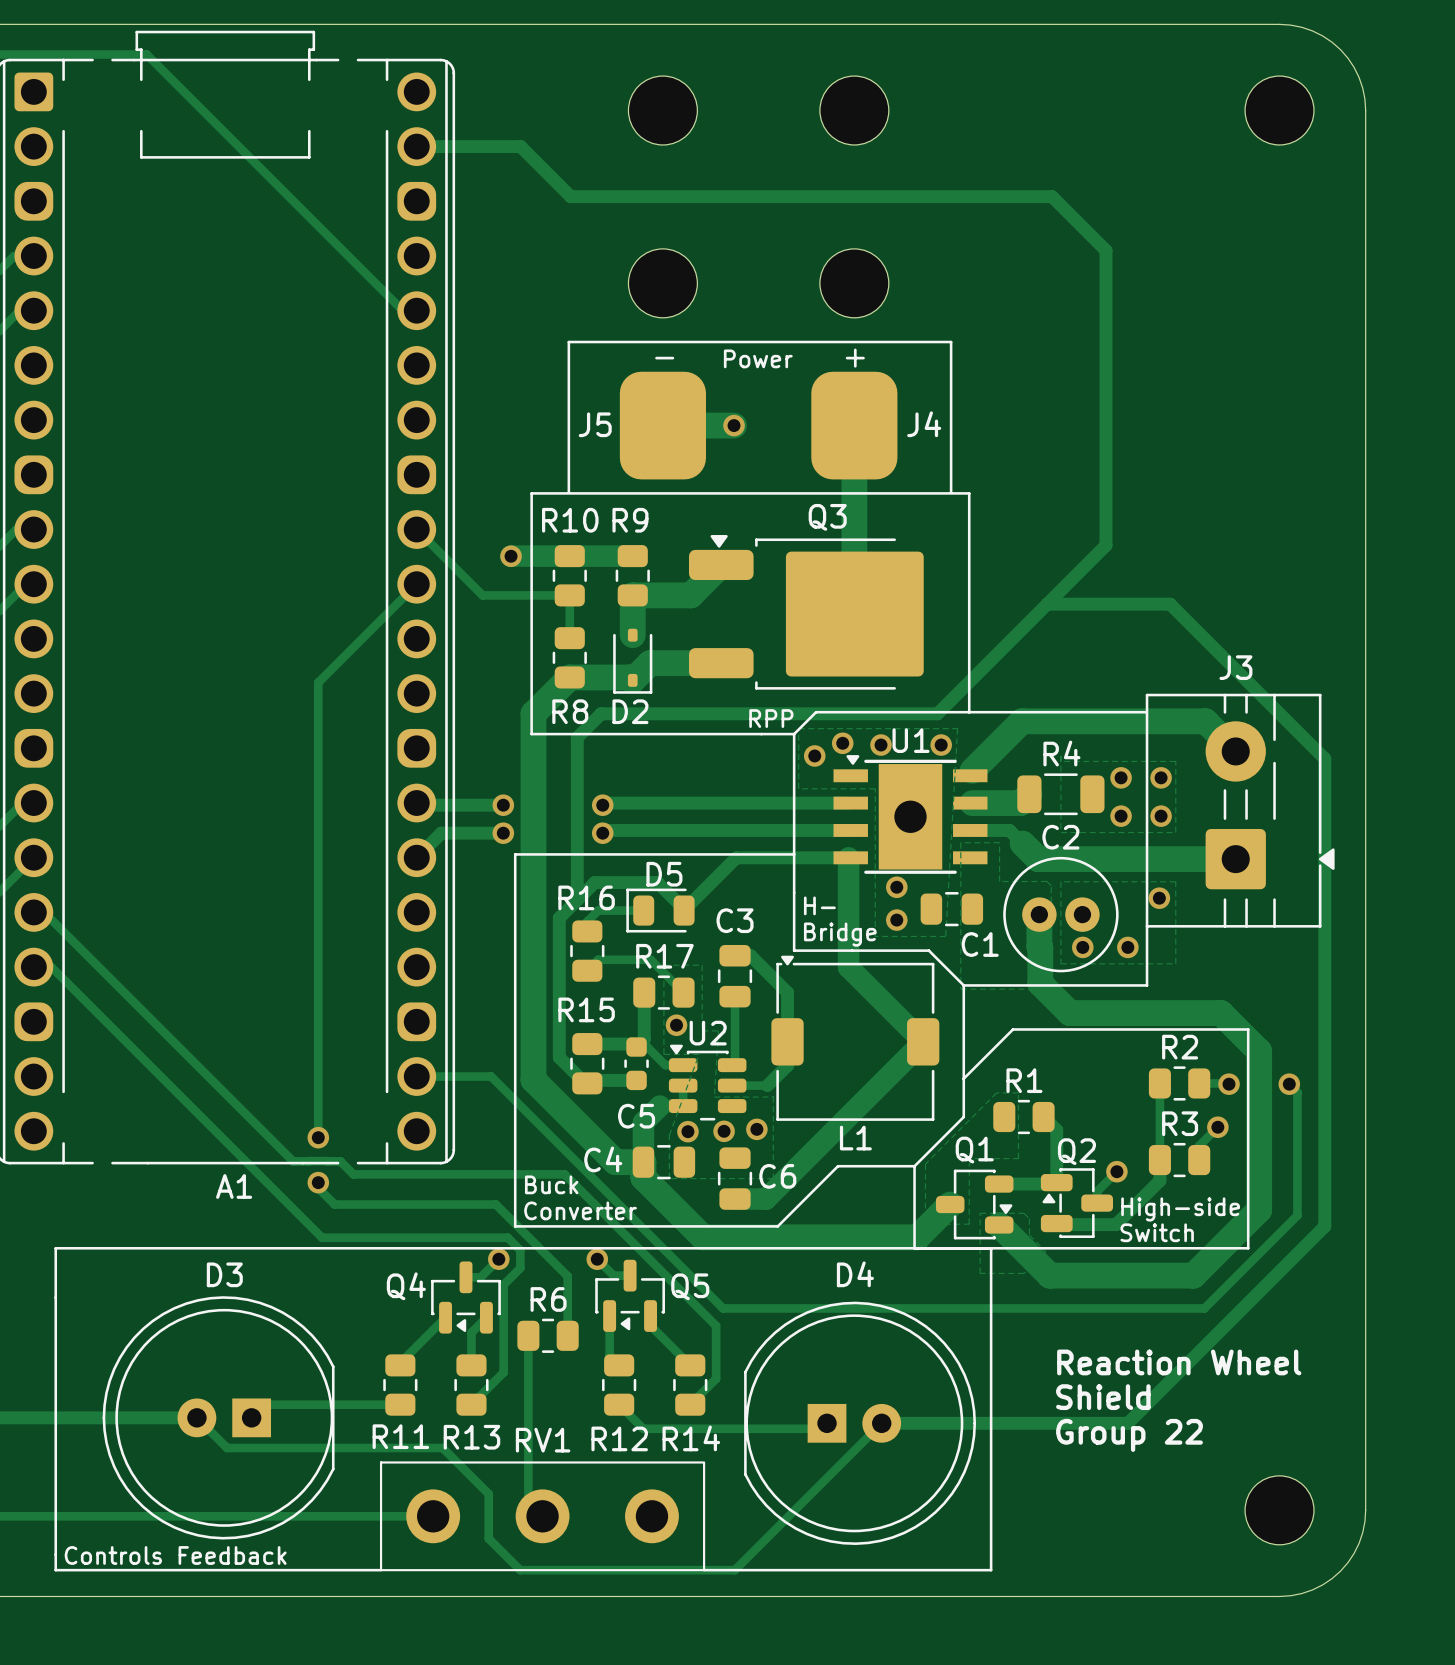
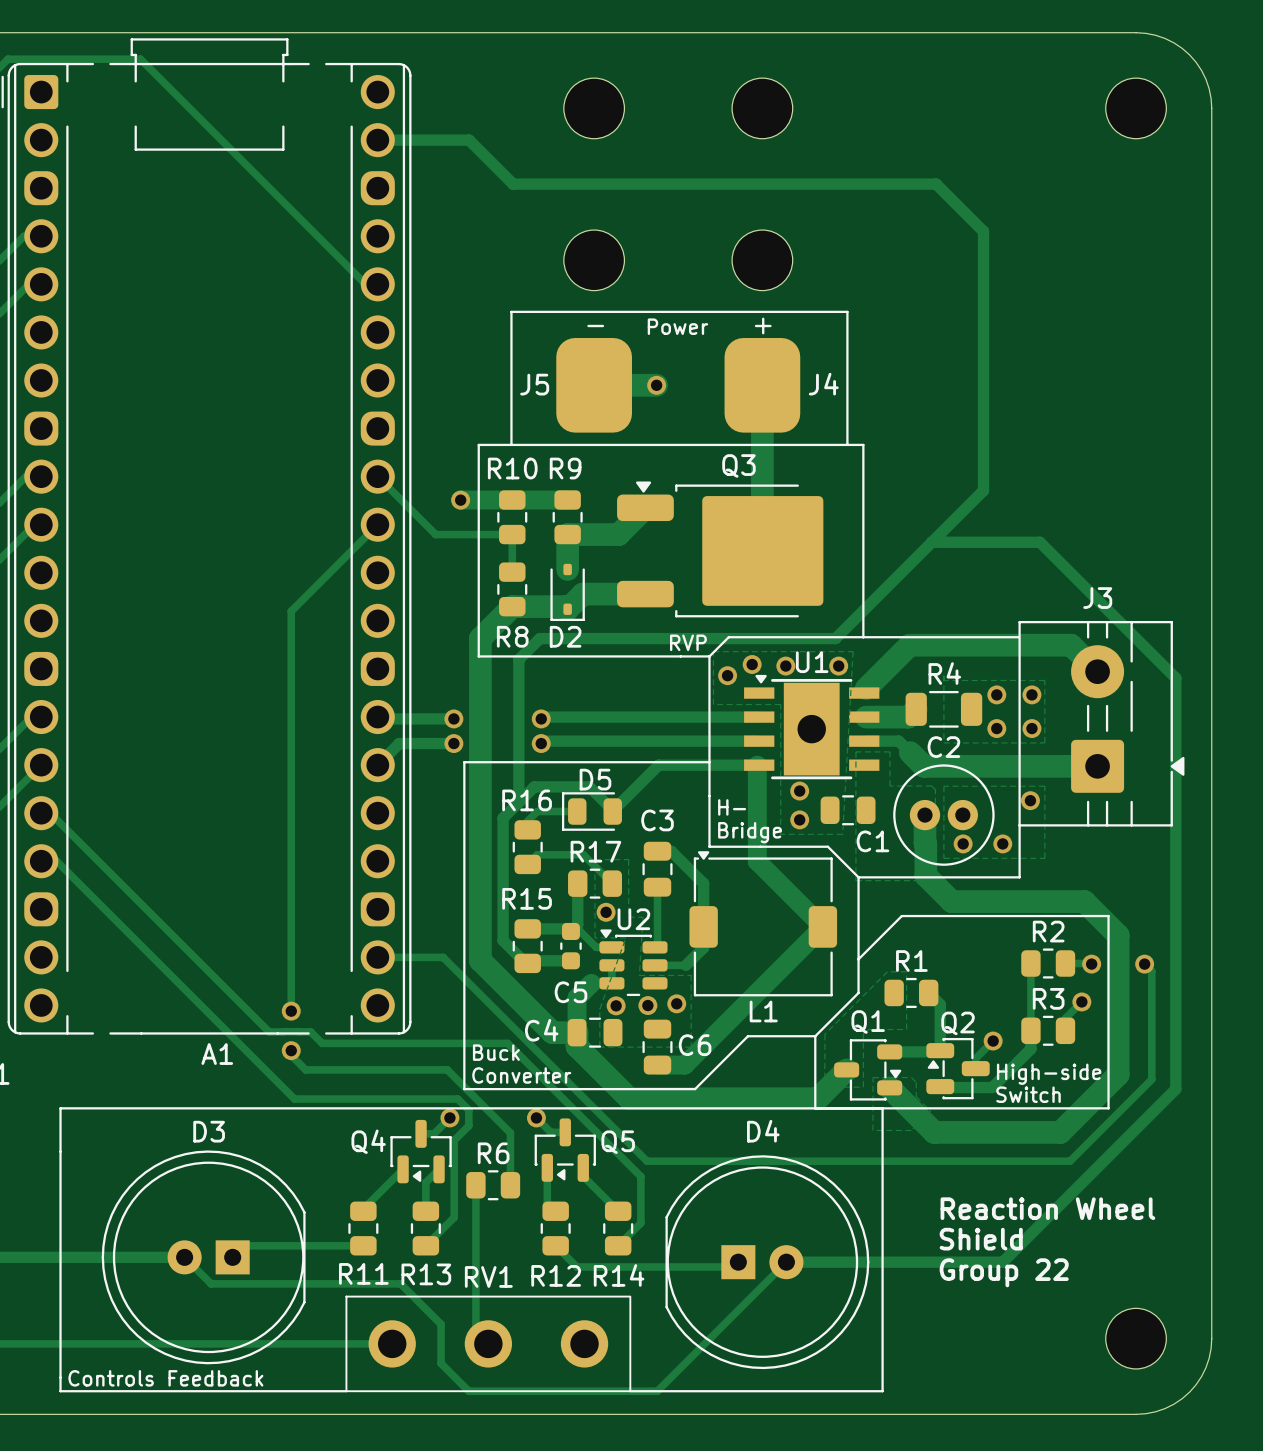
text: RPP (771, 718) -> RVP (688, 642)

